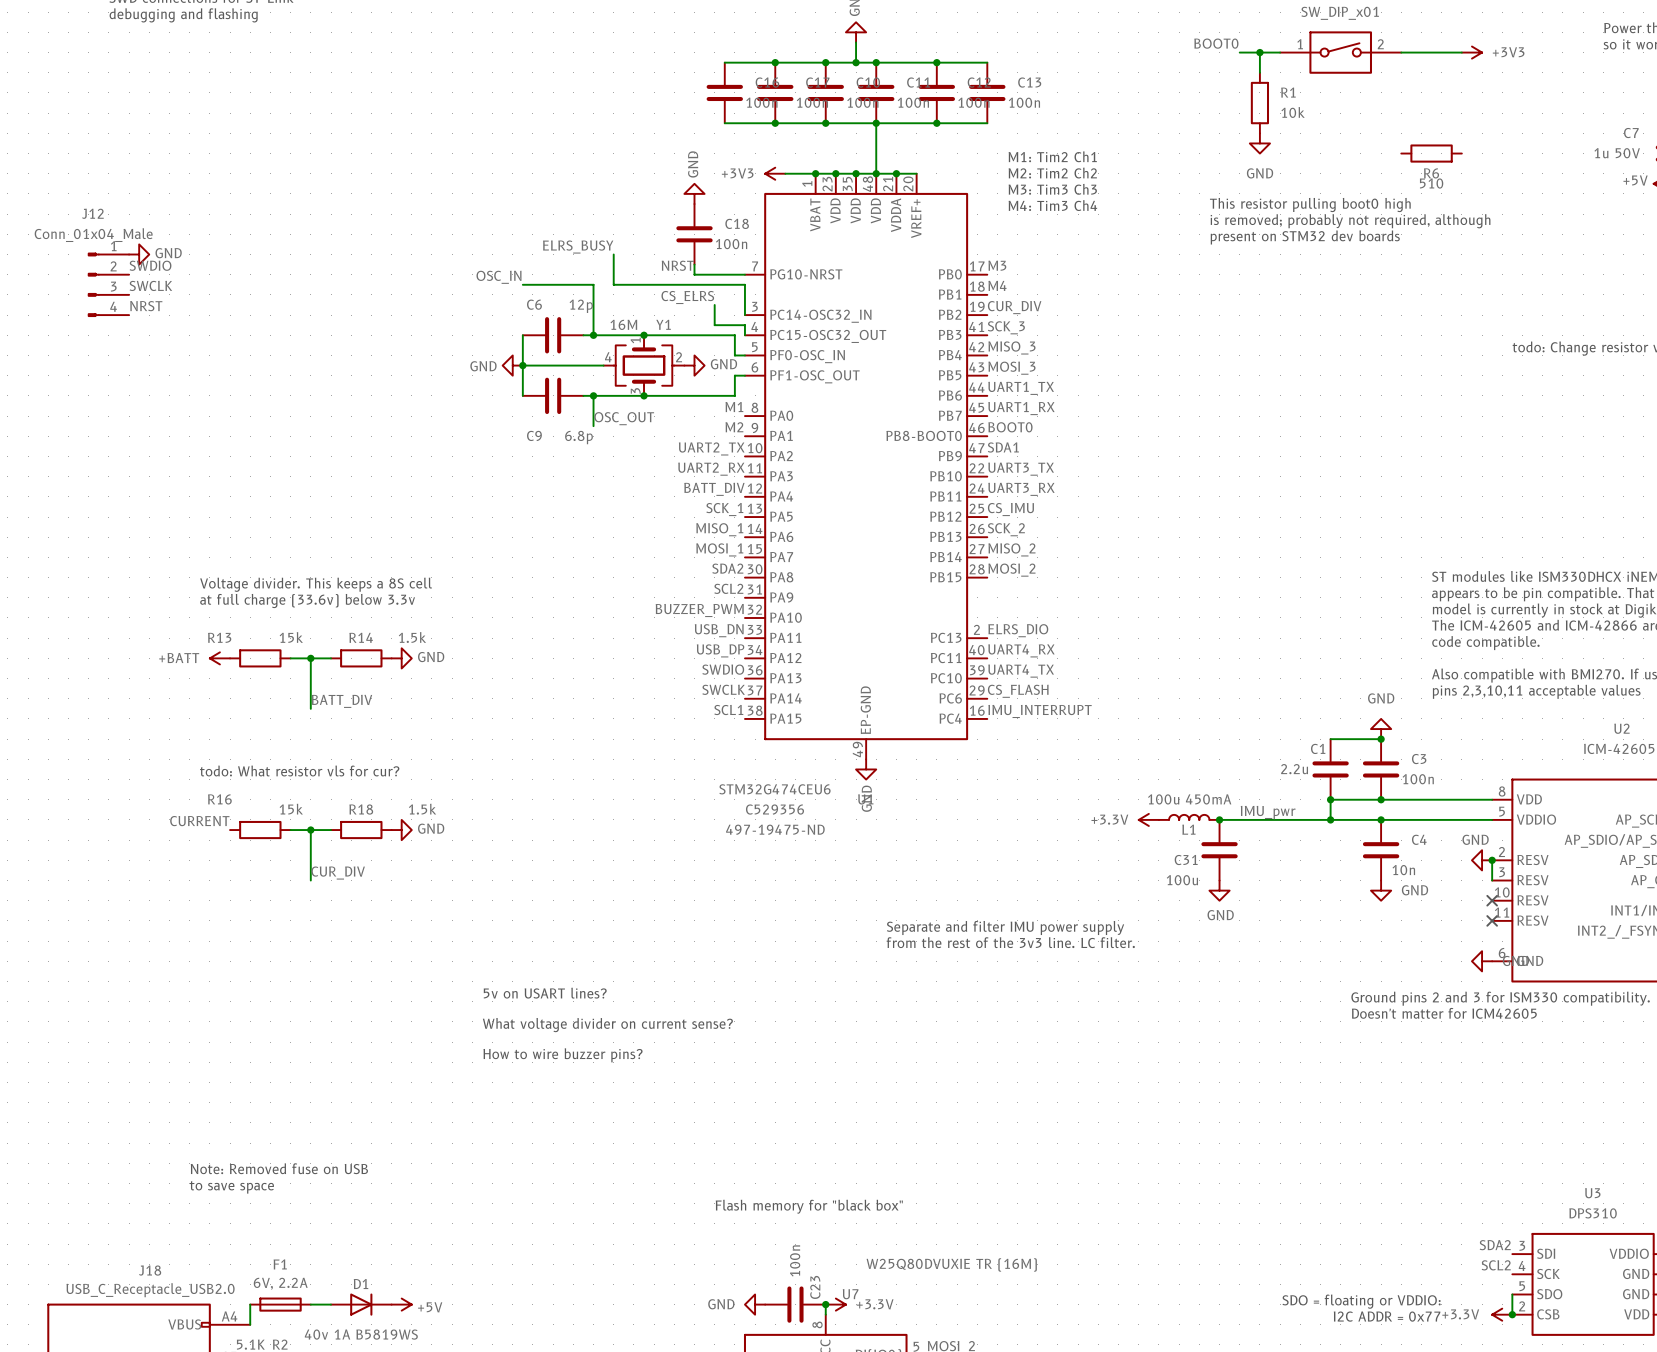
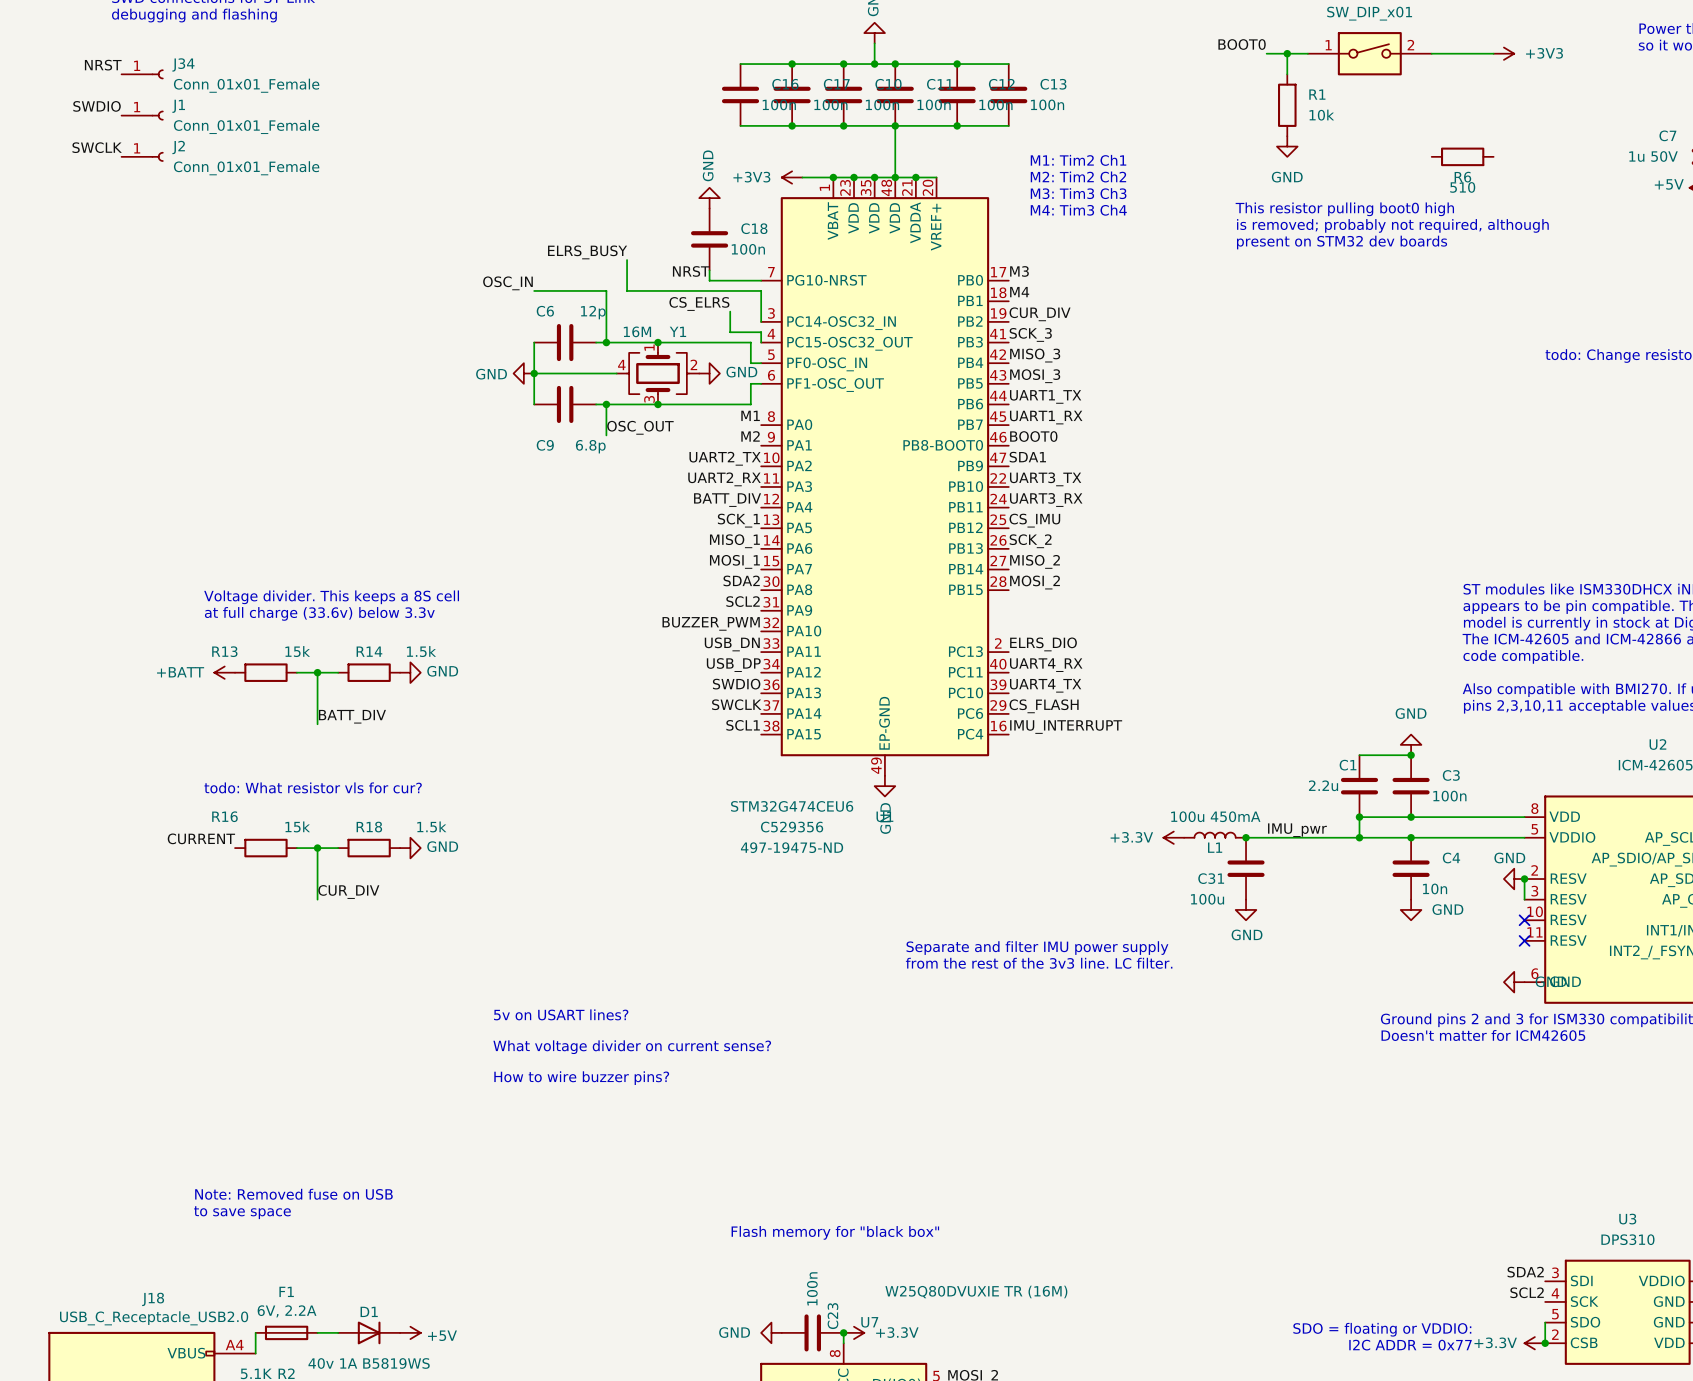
label: none -> NRST (103, 65)
J34: none -> Conn_01x01_Female (142, 74)
J1: none -> Conn_01x01_Female (142, 115)
J2: none -> Conn_01x01_Female (142, 156)
power symbol: GND (139, 254) -> none
label position: SWDIO (150, 265) -> SWDIO (97, 106)
J12: Conn_01x04_Male (108, 284) -> none
label position: SWCLK (150, 285) -> SWCLK (97, 147)
label: NRST (146, 306) -> none

